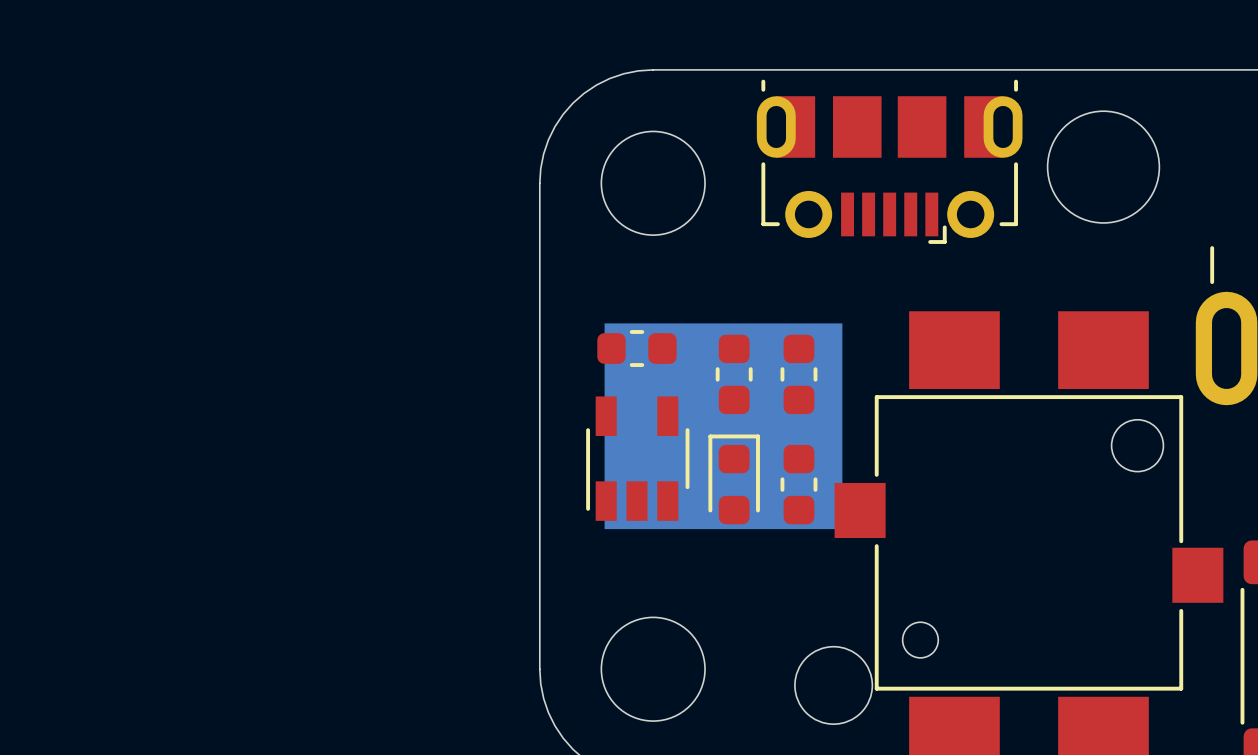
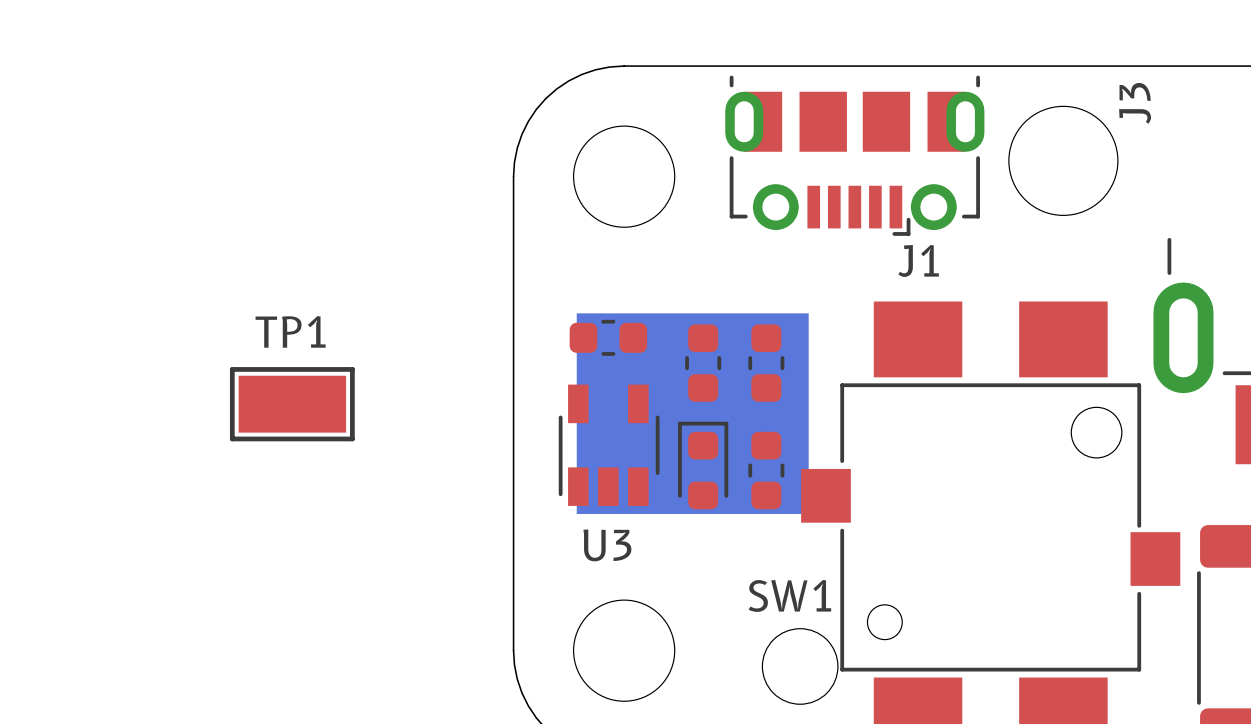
J3 name: none -> J3 (1135, 103)
J1 name: none -> J1 (918, 260)
TP1: none -> (292, 404)
U3 name: none -> U3 (607, 545)
SW1 name: none -> SW1 (789, 595)

